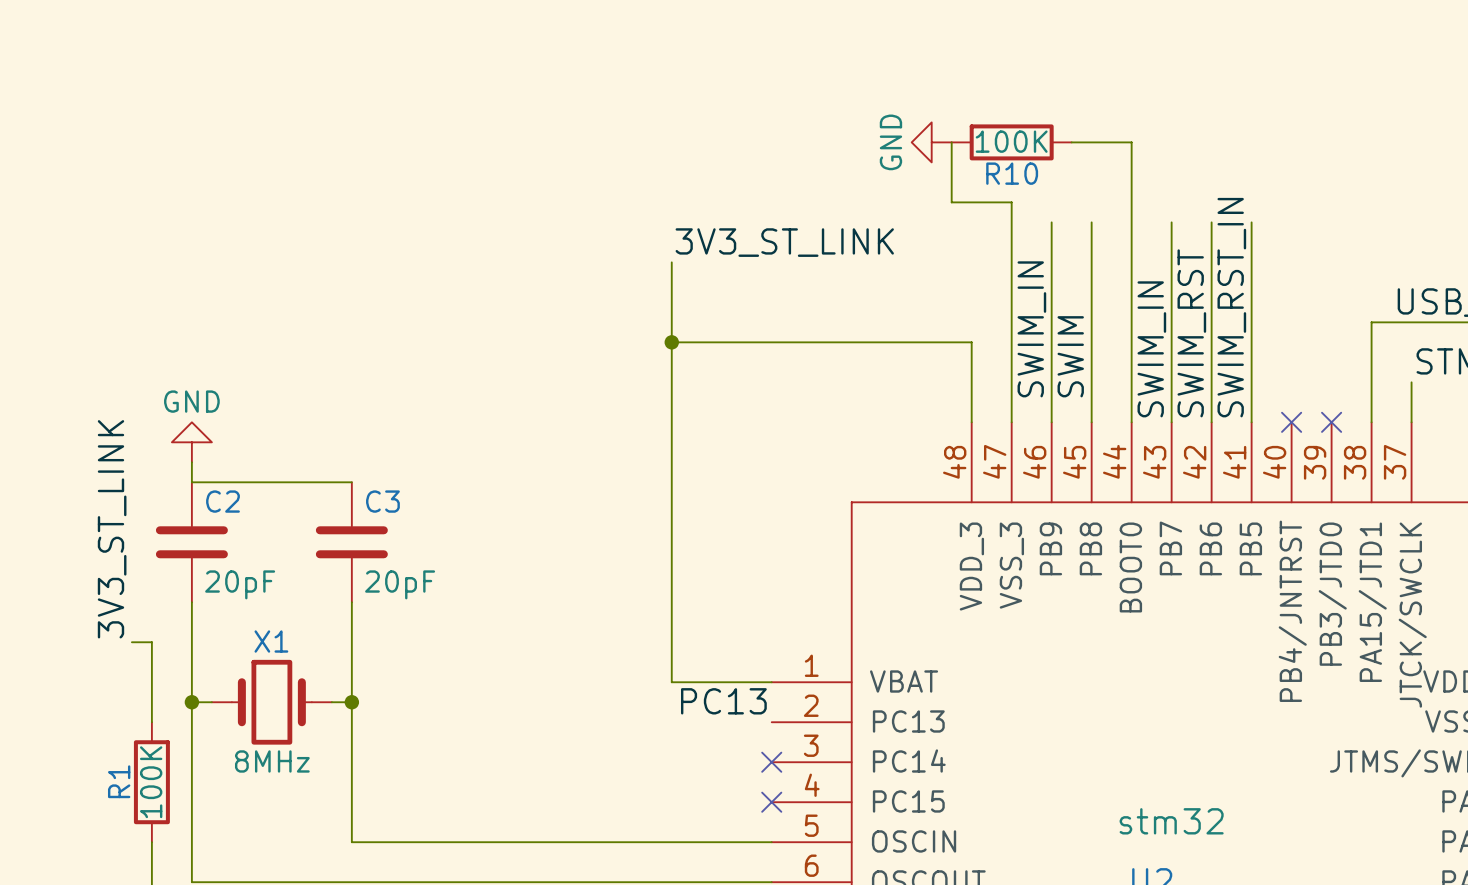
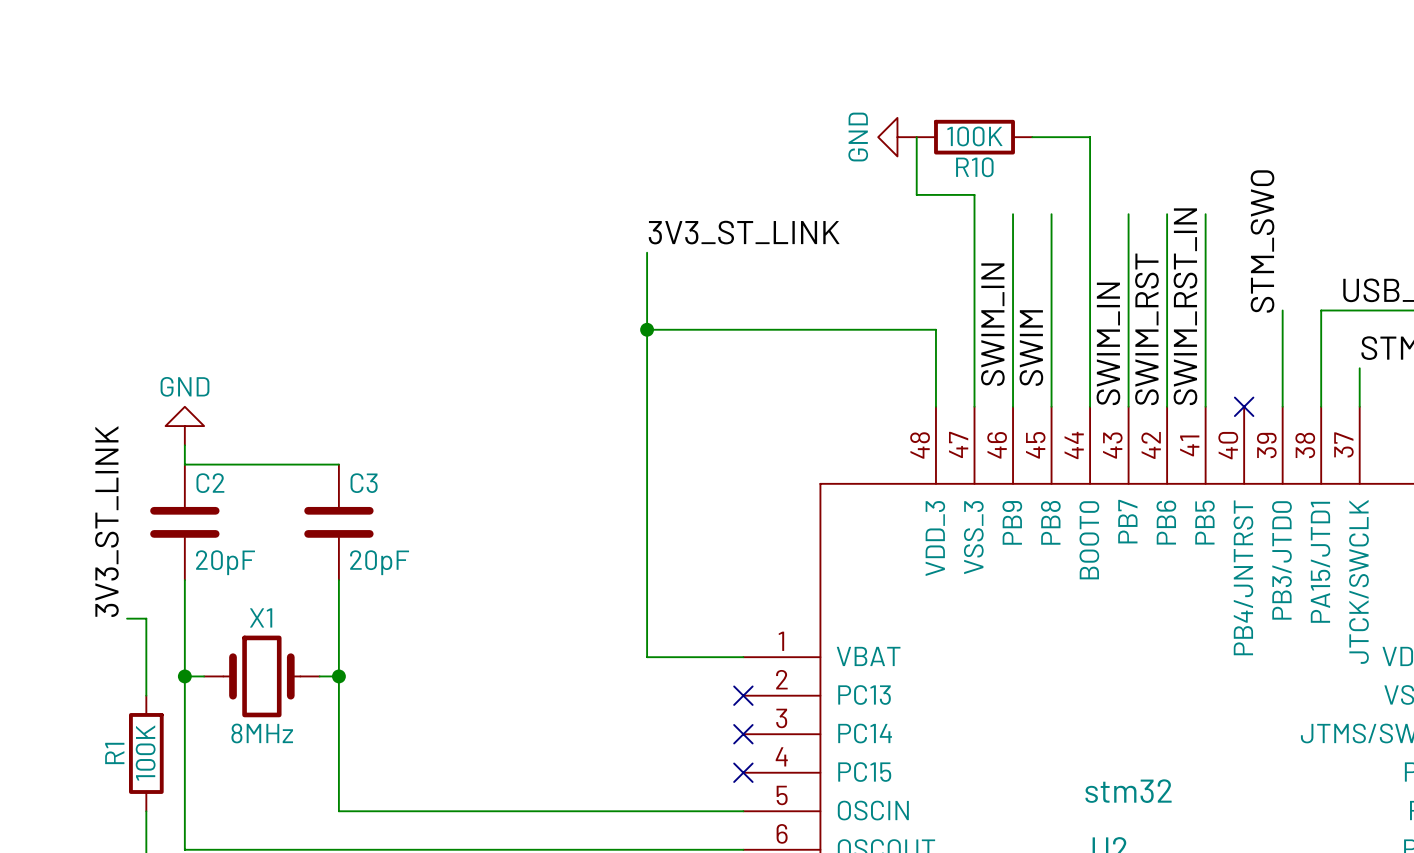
label: none -> STM_SWO (1262, 241)
wire: none -> (1282, 310) (1282, 406)
no-connect mark: (1331, 422) -> none
label: PC13 (723, 701) -> none
no-connect mark: none -> (743, 695)

